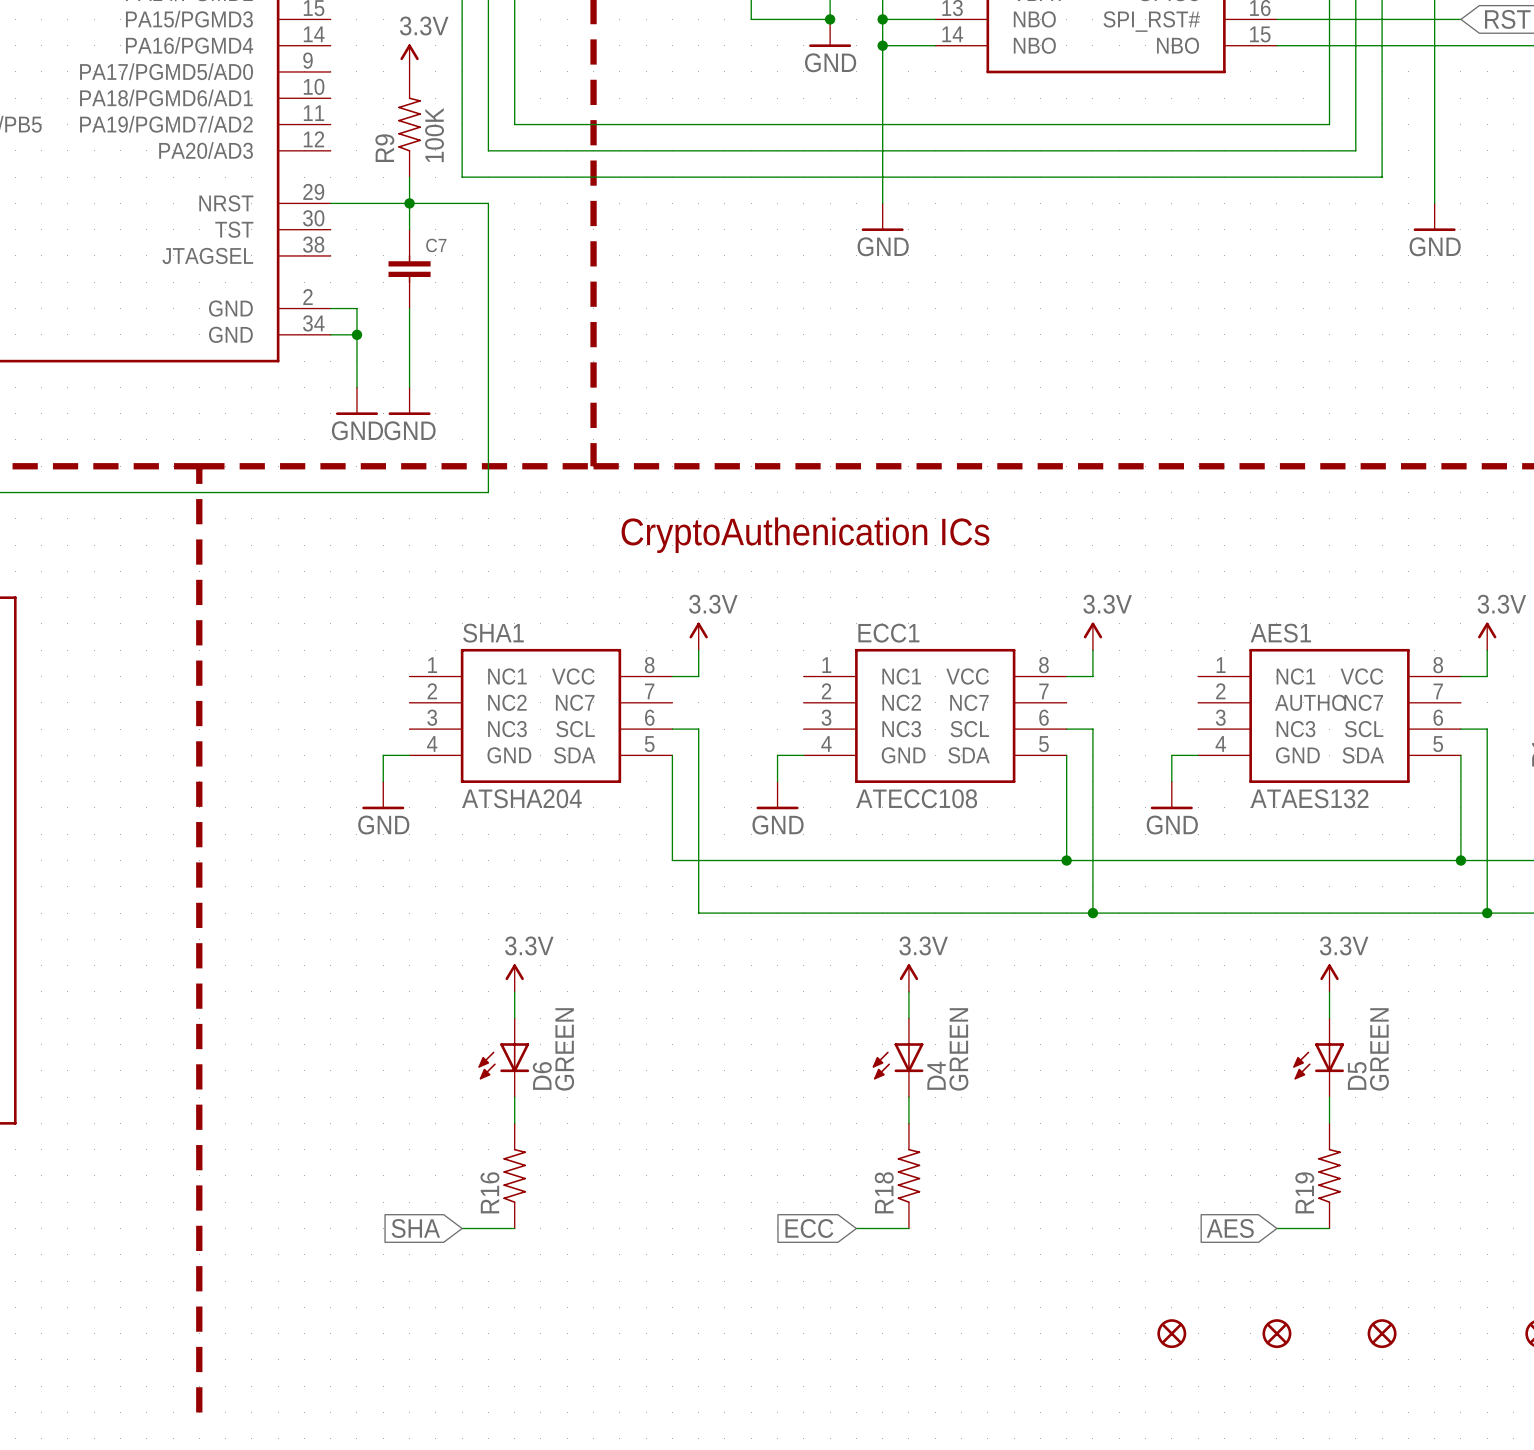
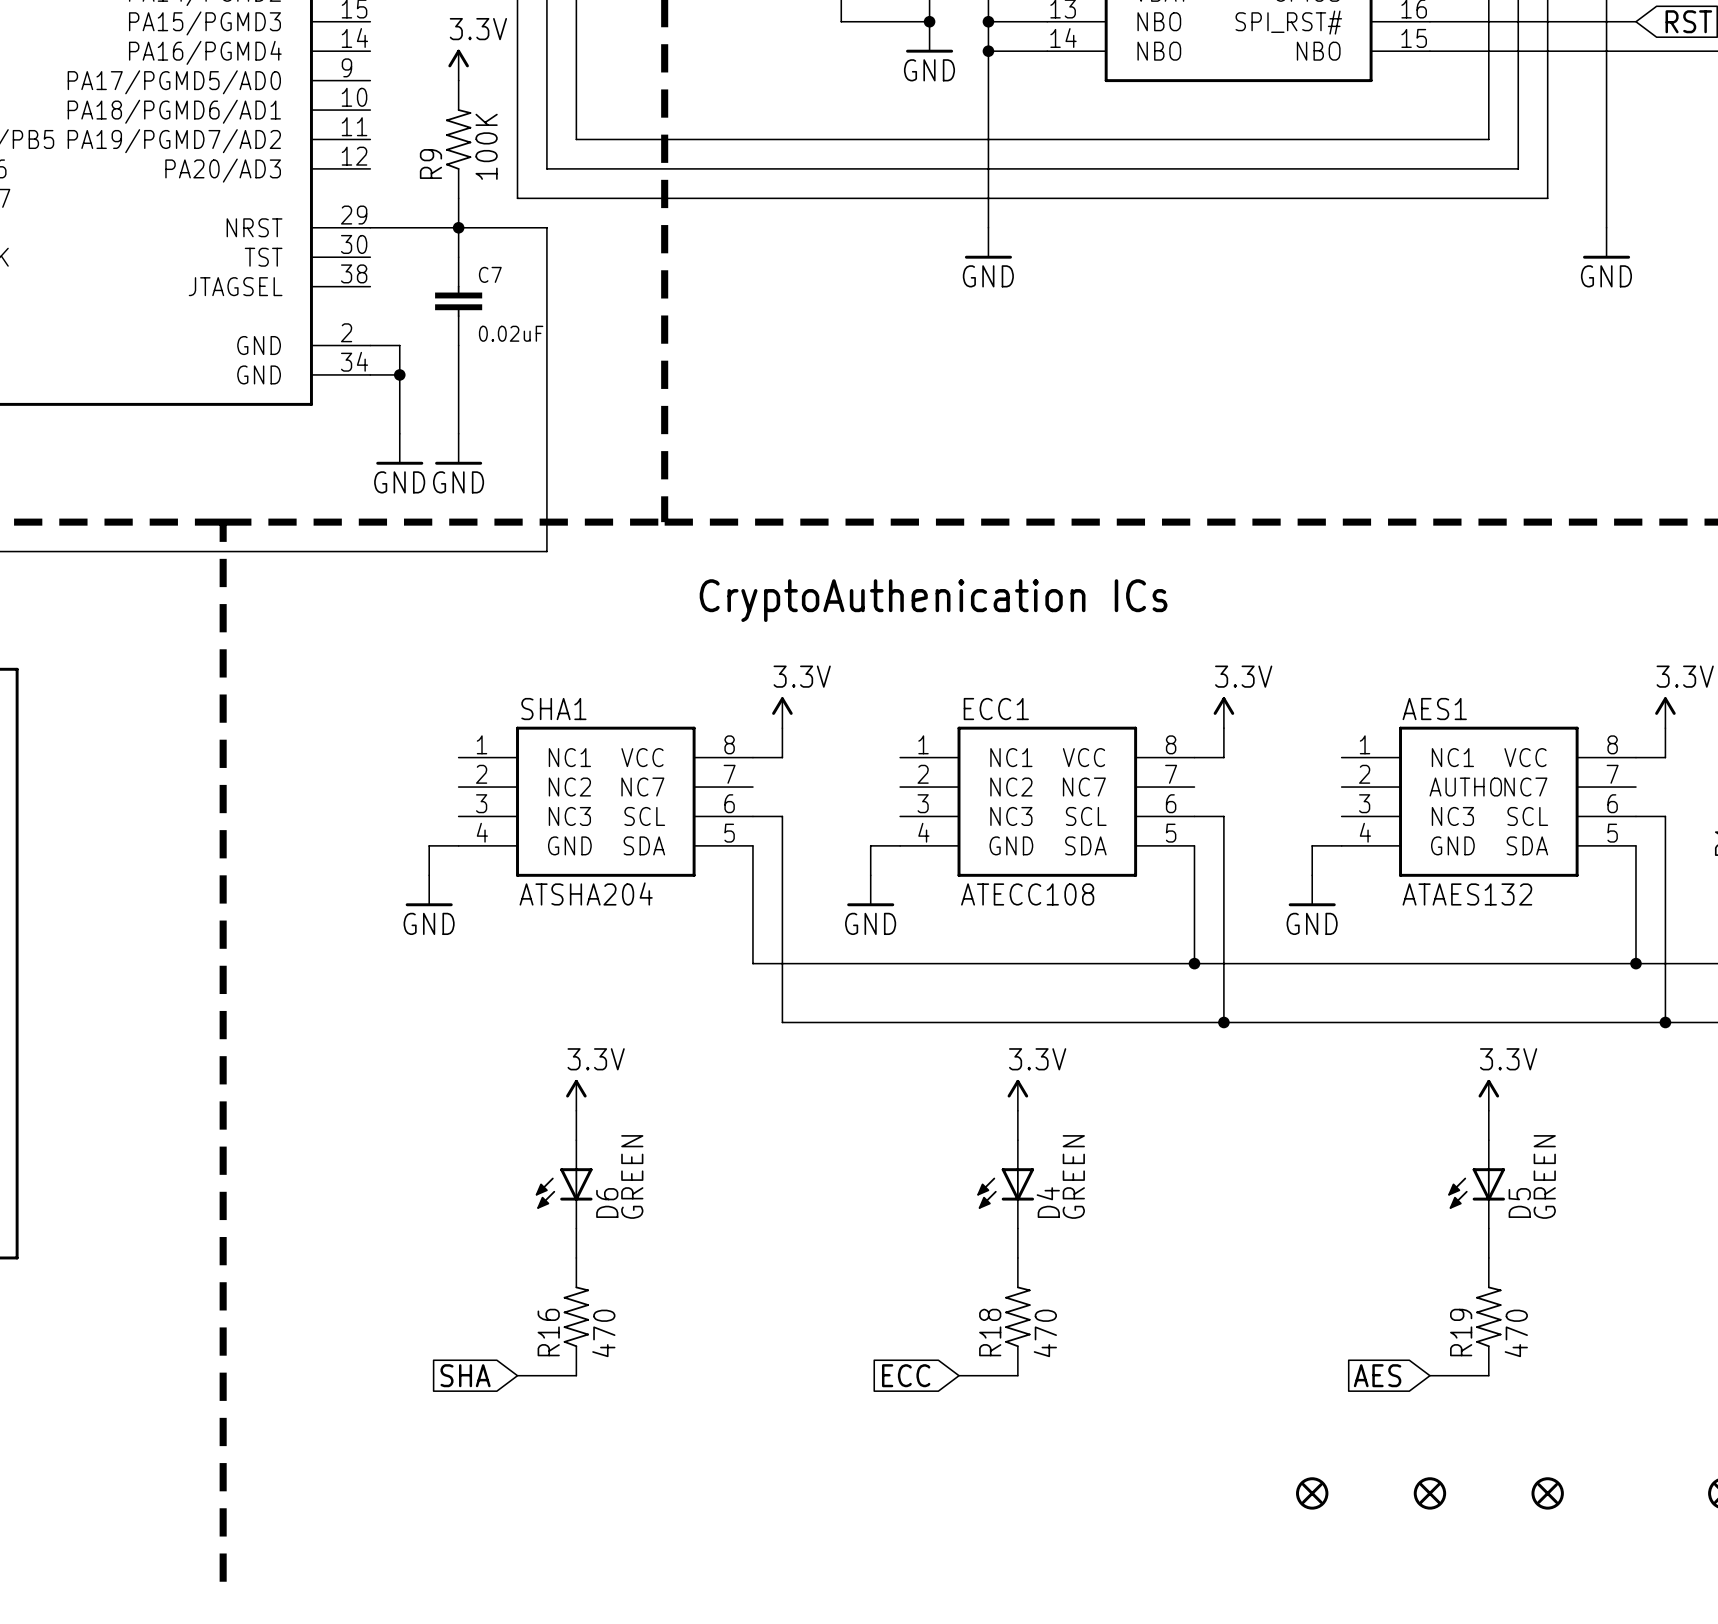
C7 value: none -> 0.02uF (511, 333)
R16 value: none -> 470 (603, 1333)
R18 value: none -> 470 (1045, 1333)
R19 value: none -> 470 (1516, 1333)

